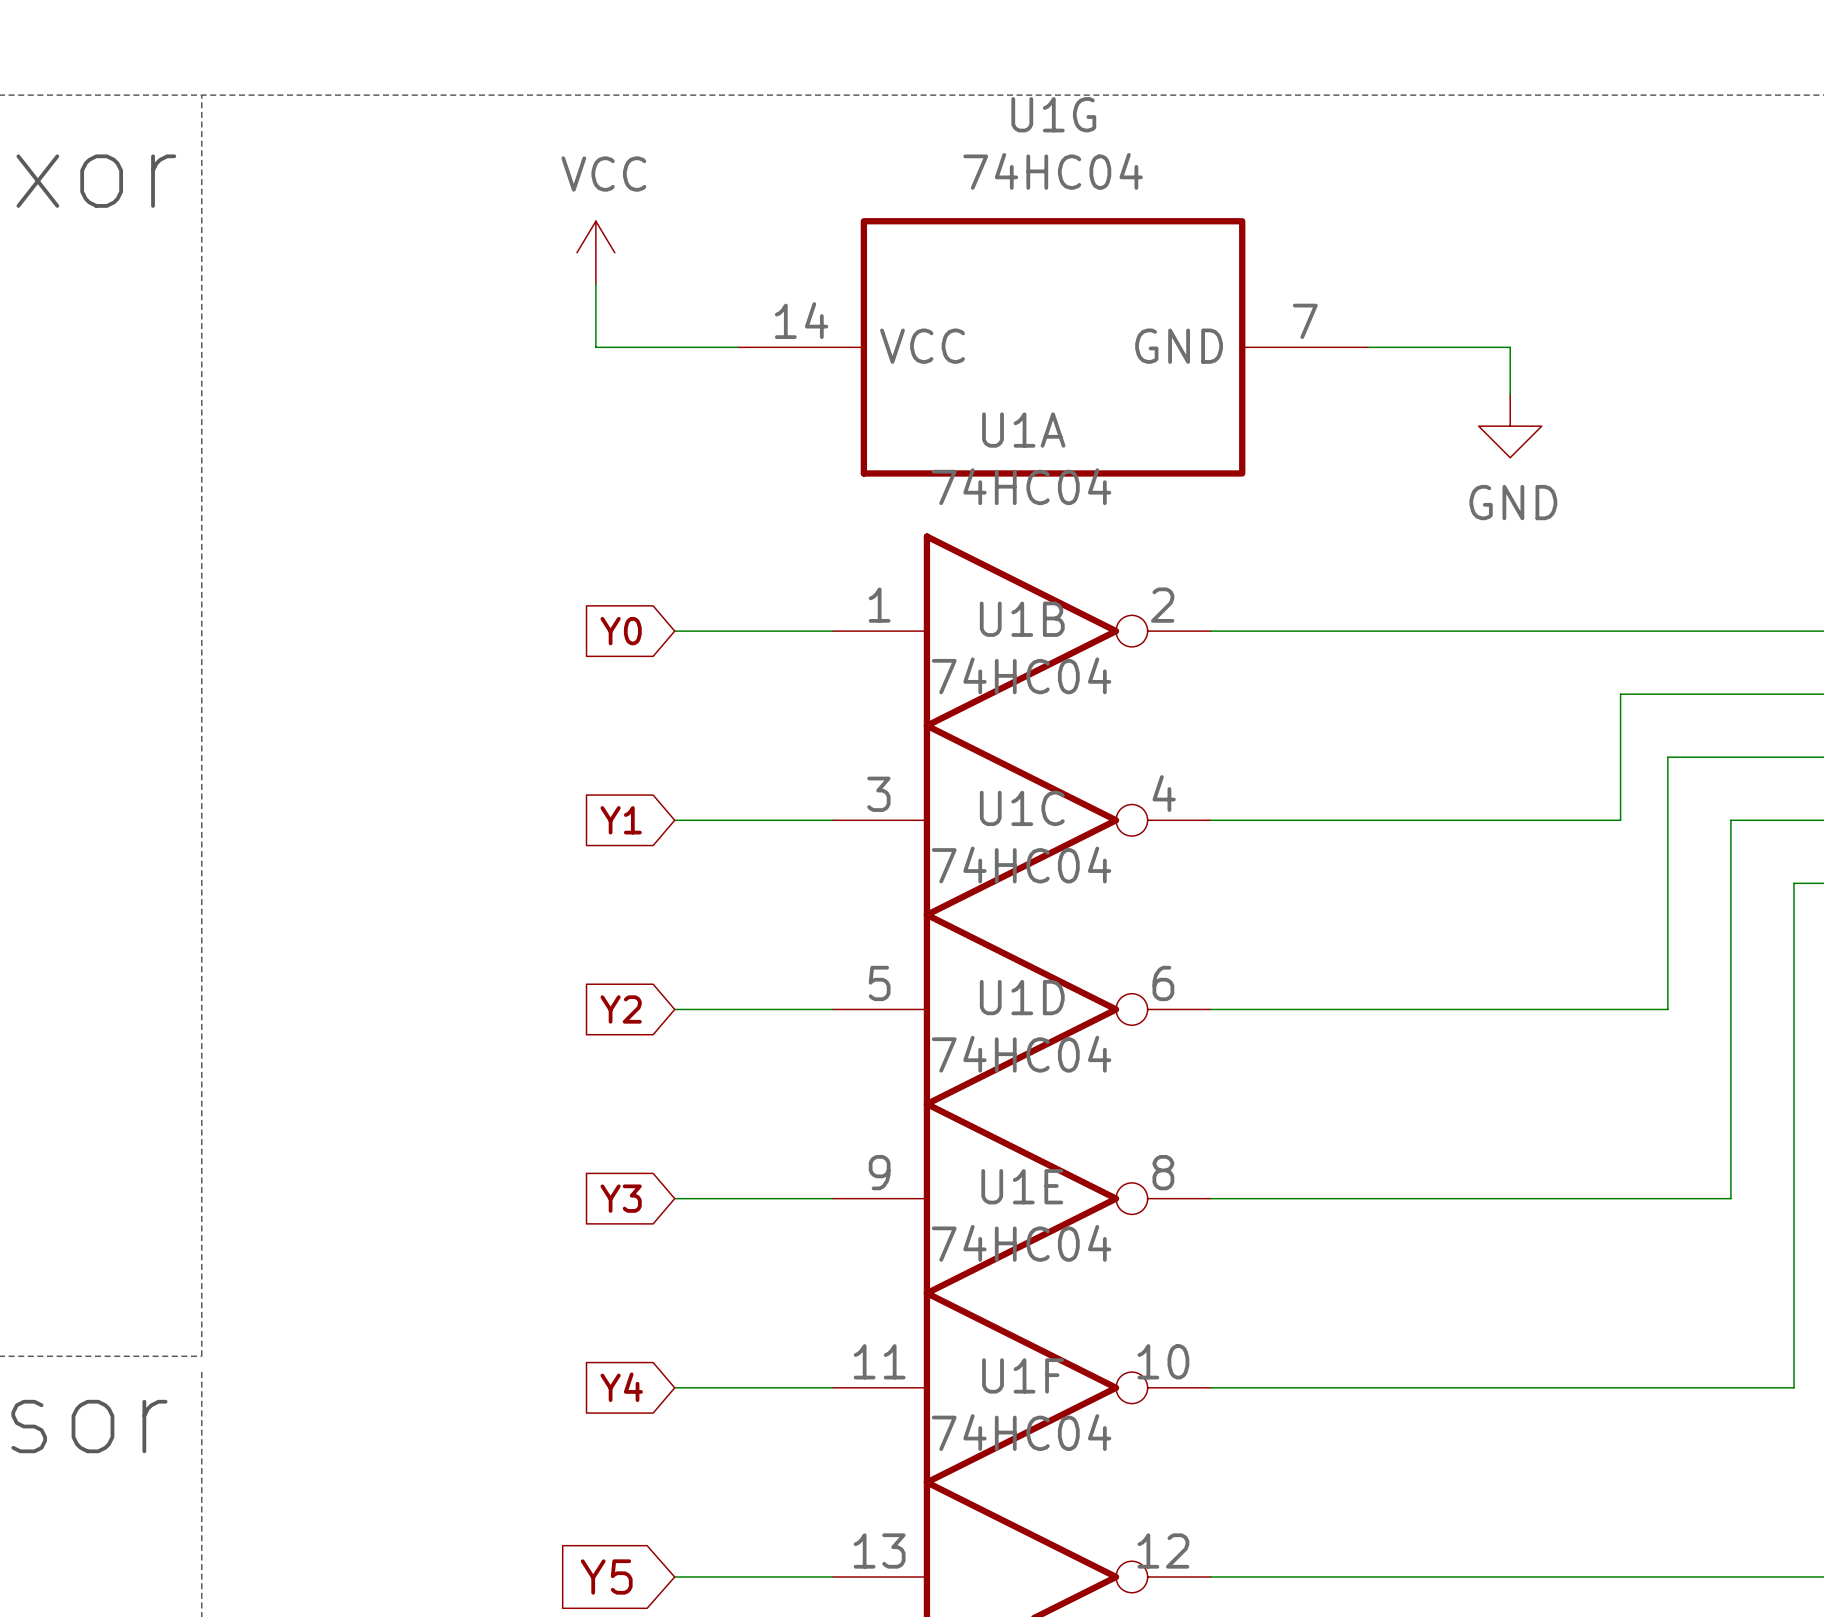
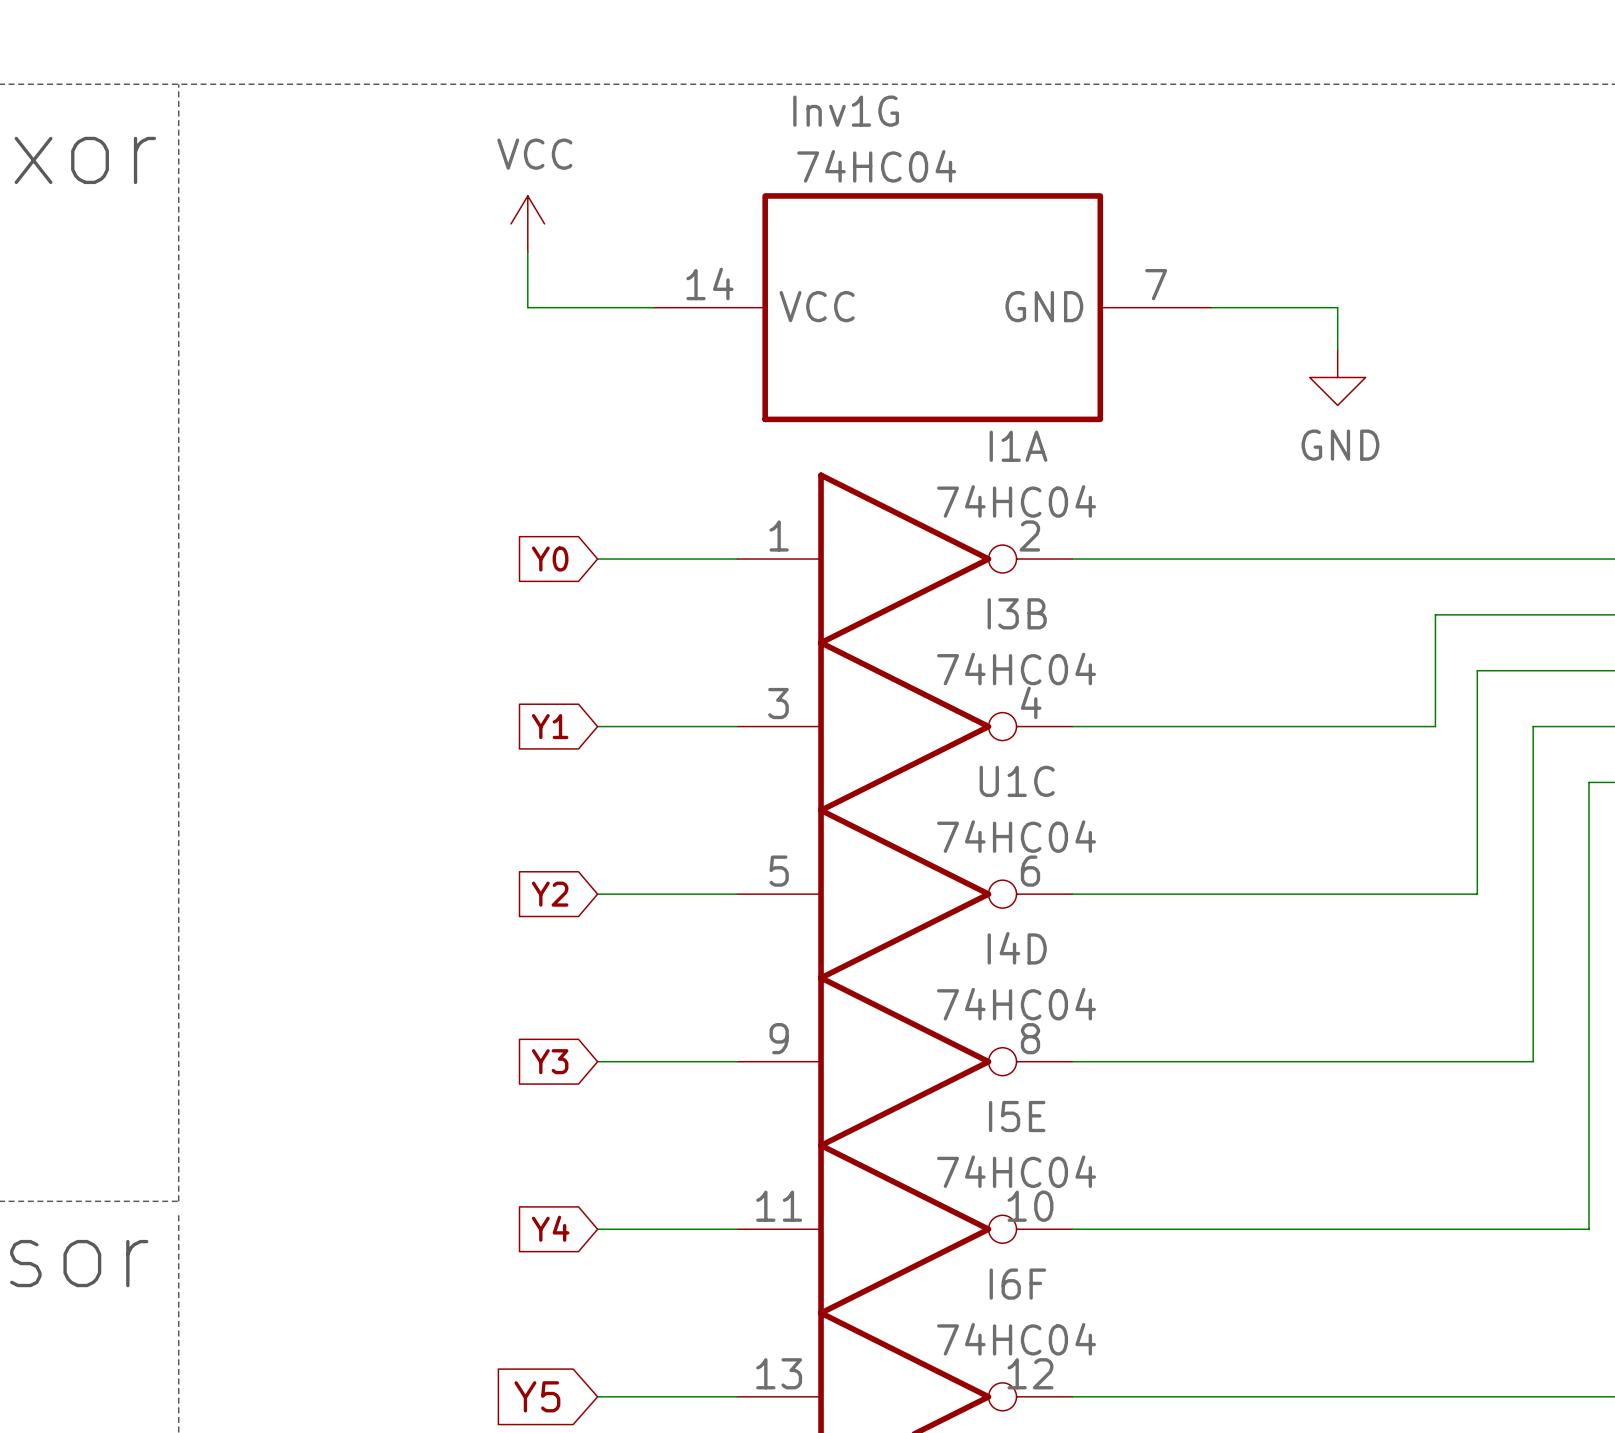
U1G name: U1G (1053, 114) -> Inv1G (846, 111)
U1G value position: 74HC04 (1053, 171) -> 74HC04 (876, 166)
U1A name: U1A (1023, 430) -> I1A (1018, 446)
U1A value position: 74HC04 (1021, 486) -> 74HC04 (1016, 501)
U1B name: U1B (1022, 619) -> I3B (1017, 613)
U1B value position: 74HC04 (1021, 675) -> 74HC04 (1016, 669)
U1C name position: U1C (1022, 808) -> U1C (1017, 781)
U1C value position: 74HC04 (1021, 865) -> 74HC04 (1016, 836)
U1D name: U1D (1022, 997) -> I4D (1017, 948)
U1D value position: 74HC04 (1021, 1054) -> 74HC04 (1016, 1004)
U1E name: U1E (1022, 1186) -> I5E (1017, 1116)
U1E value position: 74HC04 (1021, 1243) -> 74HC04 (1016, 1171)
U1F name: U1F (1023, 1375) -> I6F (1017, 1284)
U1F value position: 74HC04 (1021, 1432) -> 74HC04 (1016, 1339)

